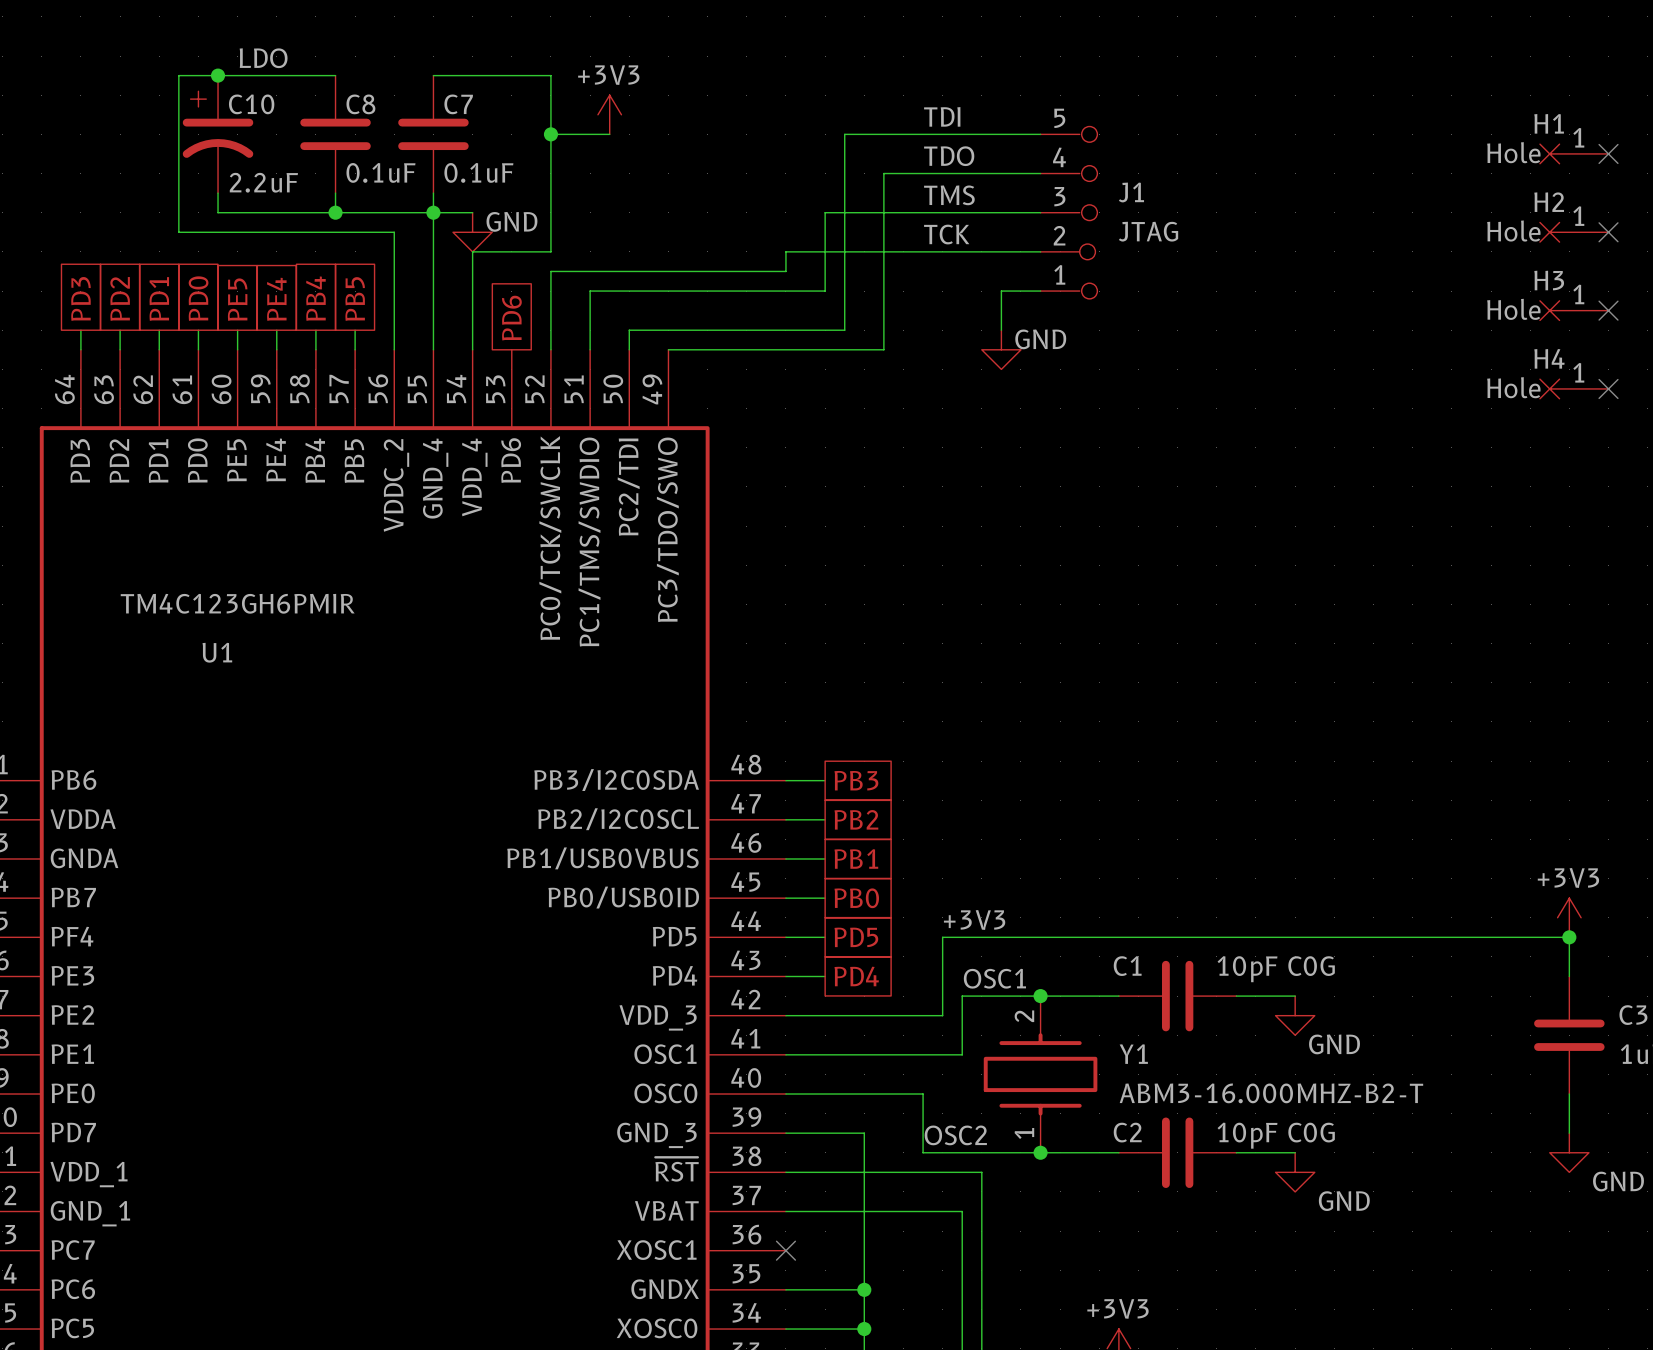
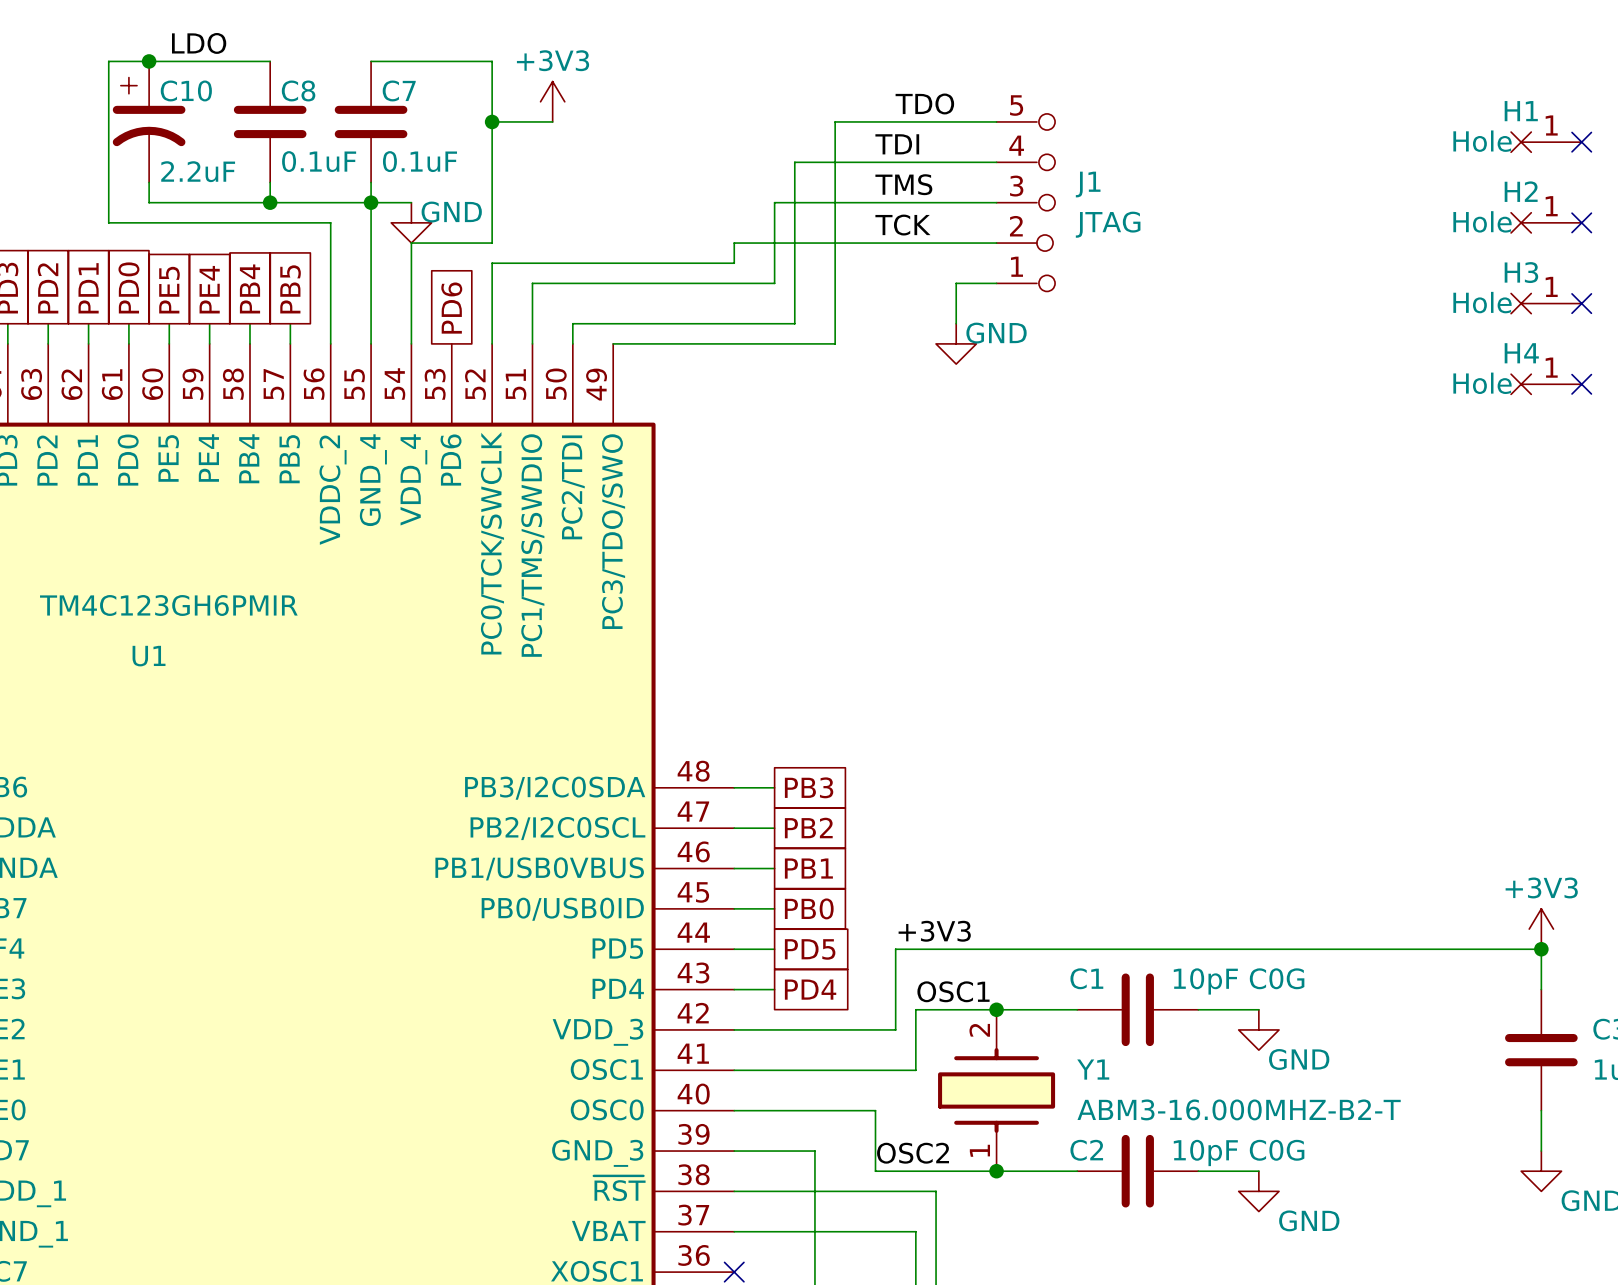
label: TDI (942, 116) -> TDO (924, 103)
wire: (883, 134) (844, 134) (844, 173) -> (835, 121) (835, 162) (794, 162)
label: TDO (949, 156) -> TDI (897, 144)

